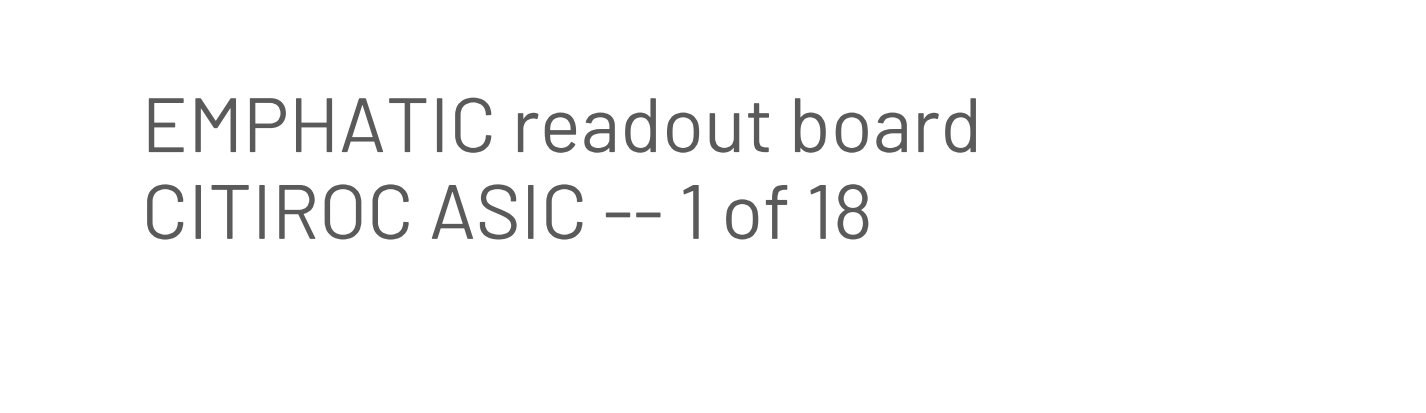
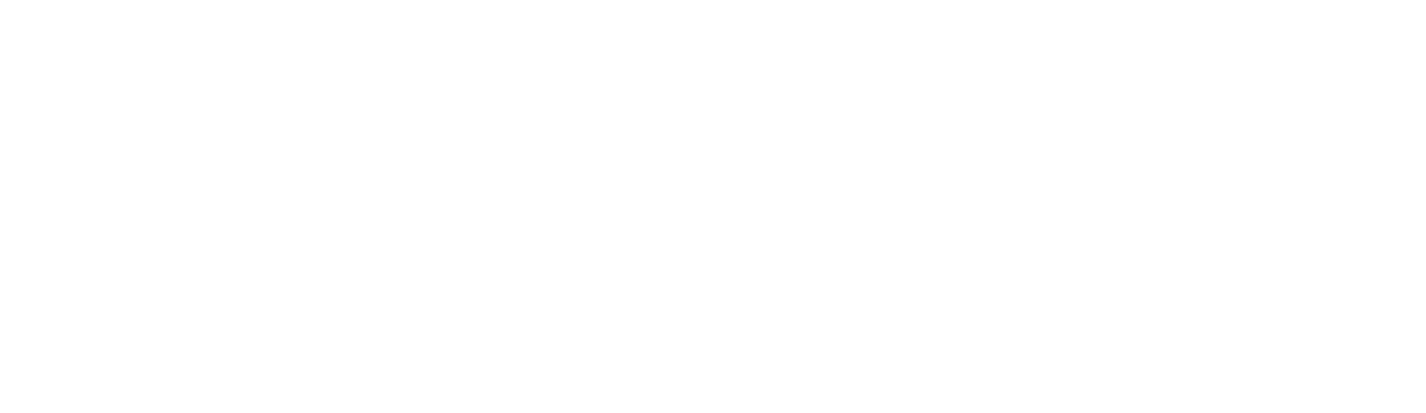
text: EMPHATIC readout board (562, 125) -> none
text: CITIROC ASIC -- 1 of 18 (507, 211) -> none

